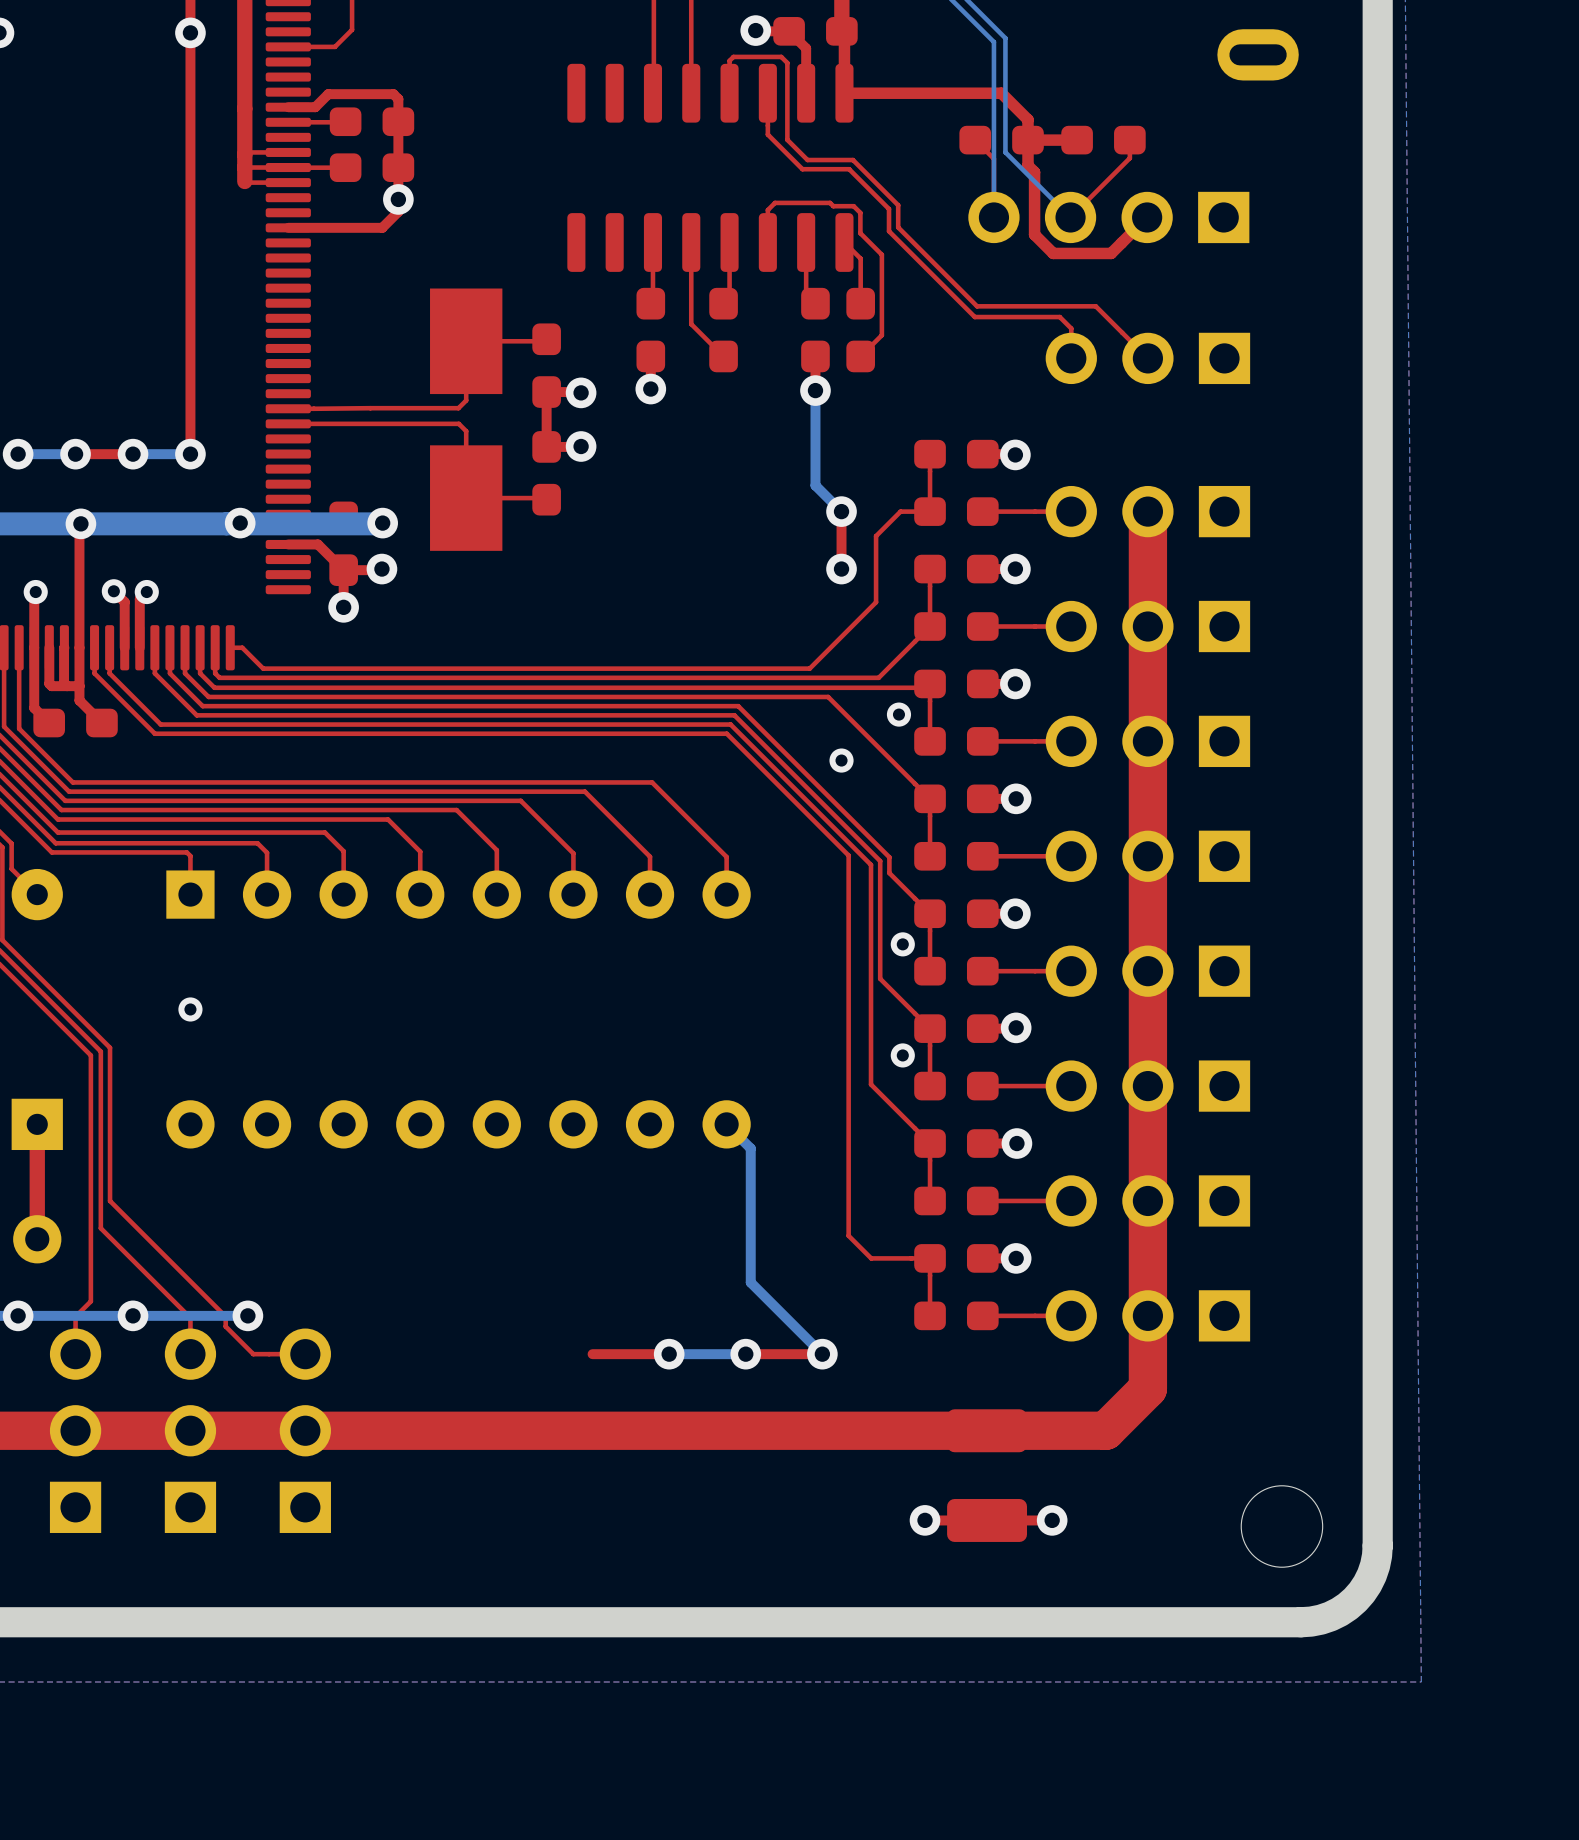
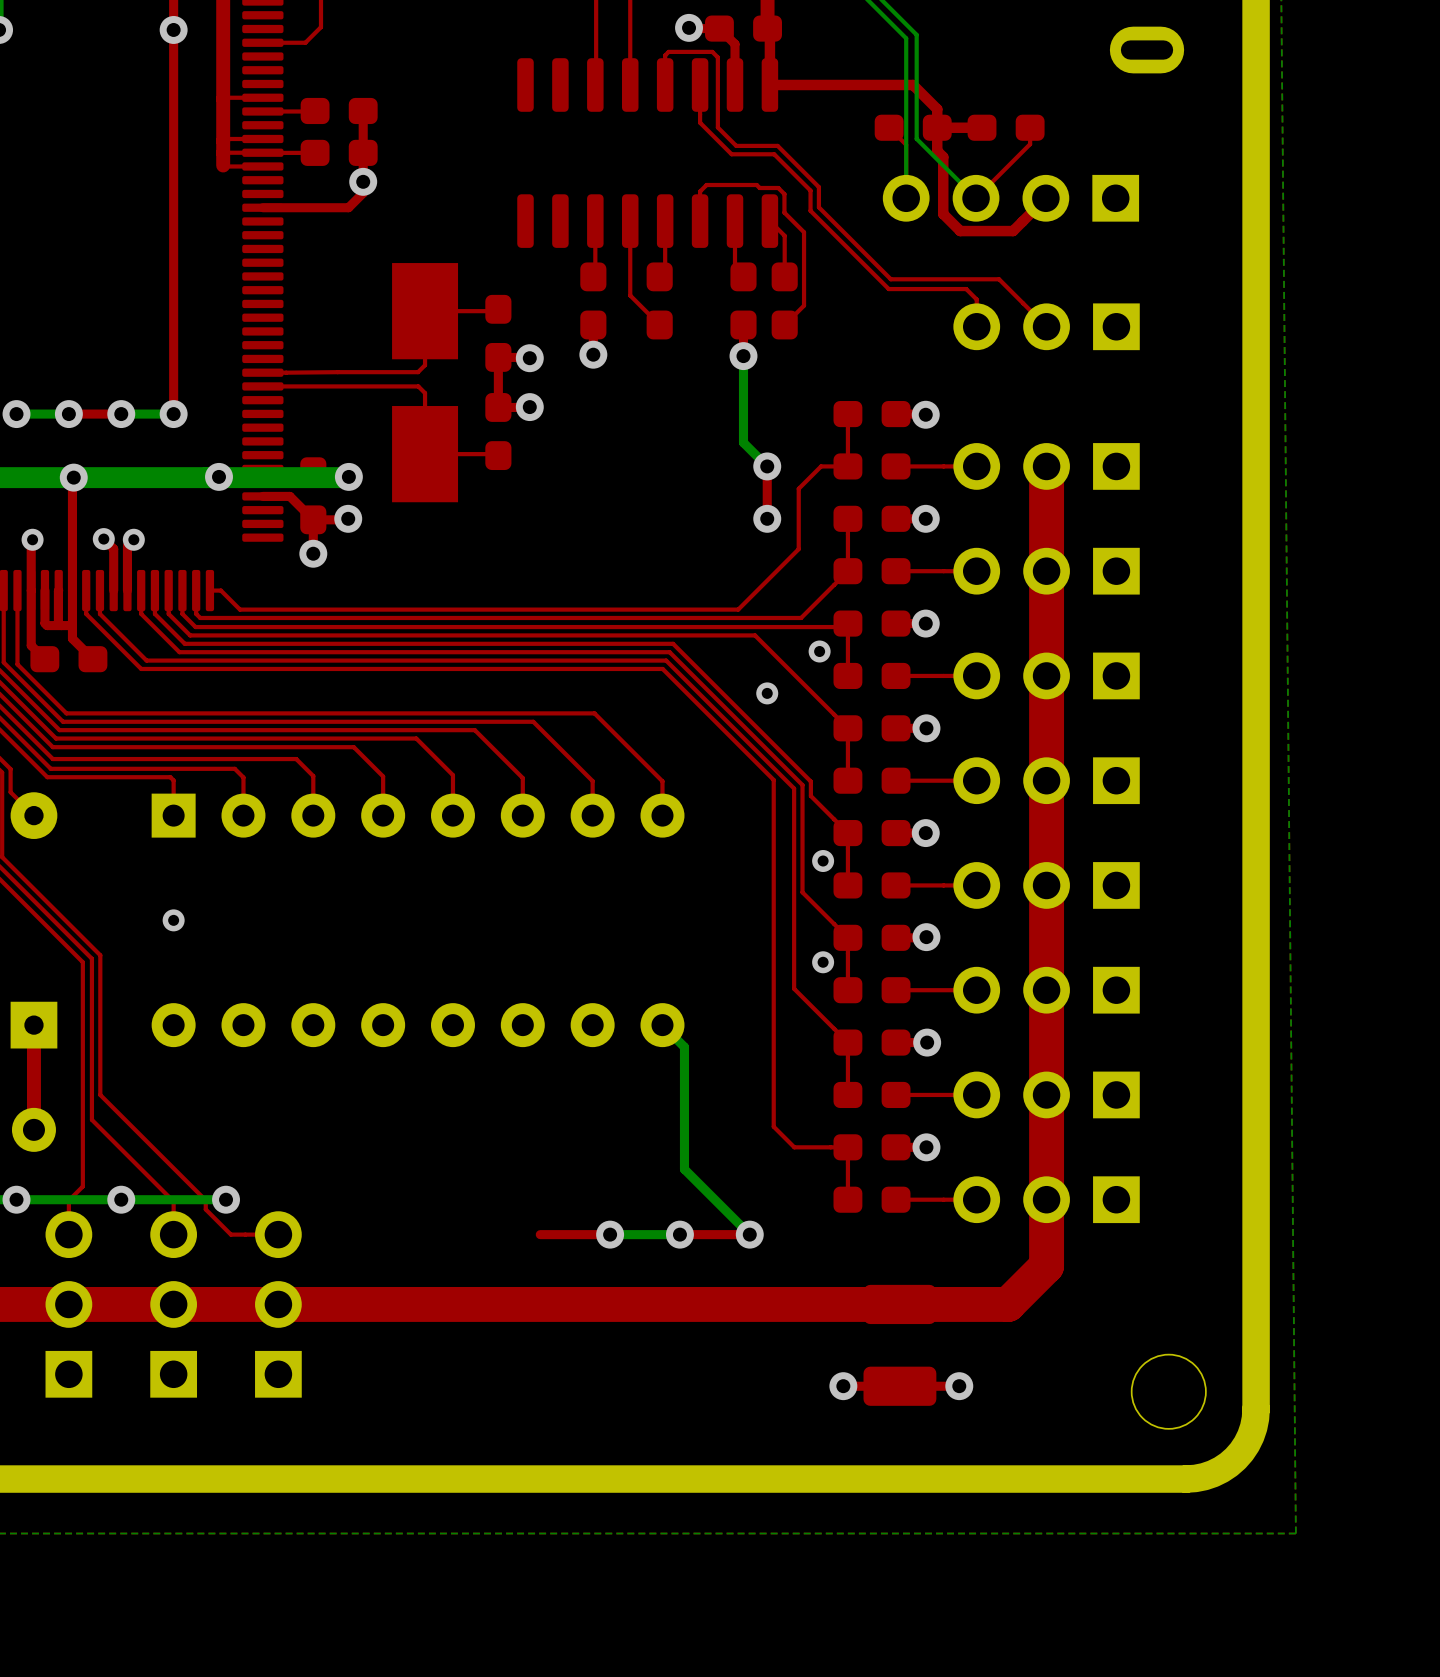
top track: none -> (248, 97) (224, 97)
top track: (288, 107) (315, 107) (328, 94) (393, 94) (398, 99) (398, 121) -> none

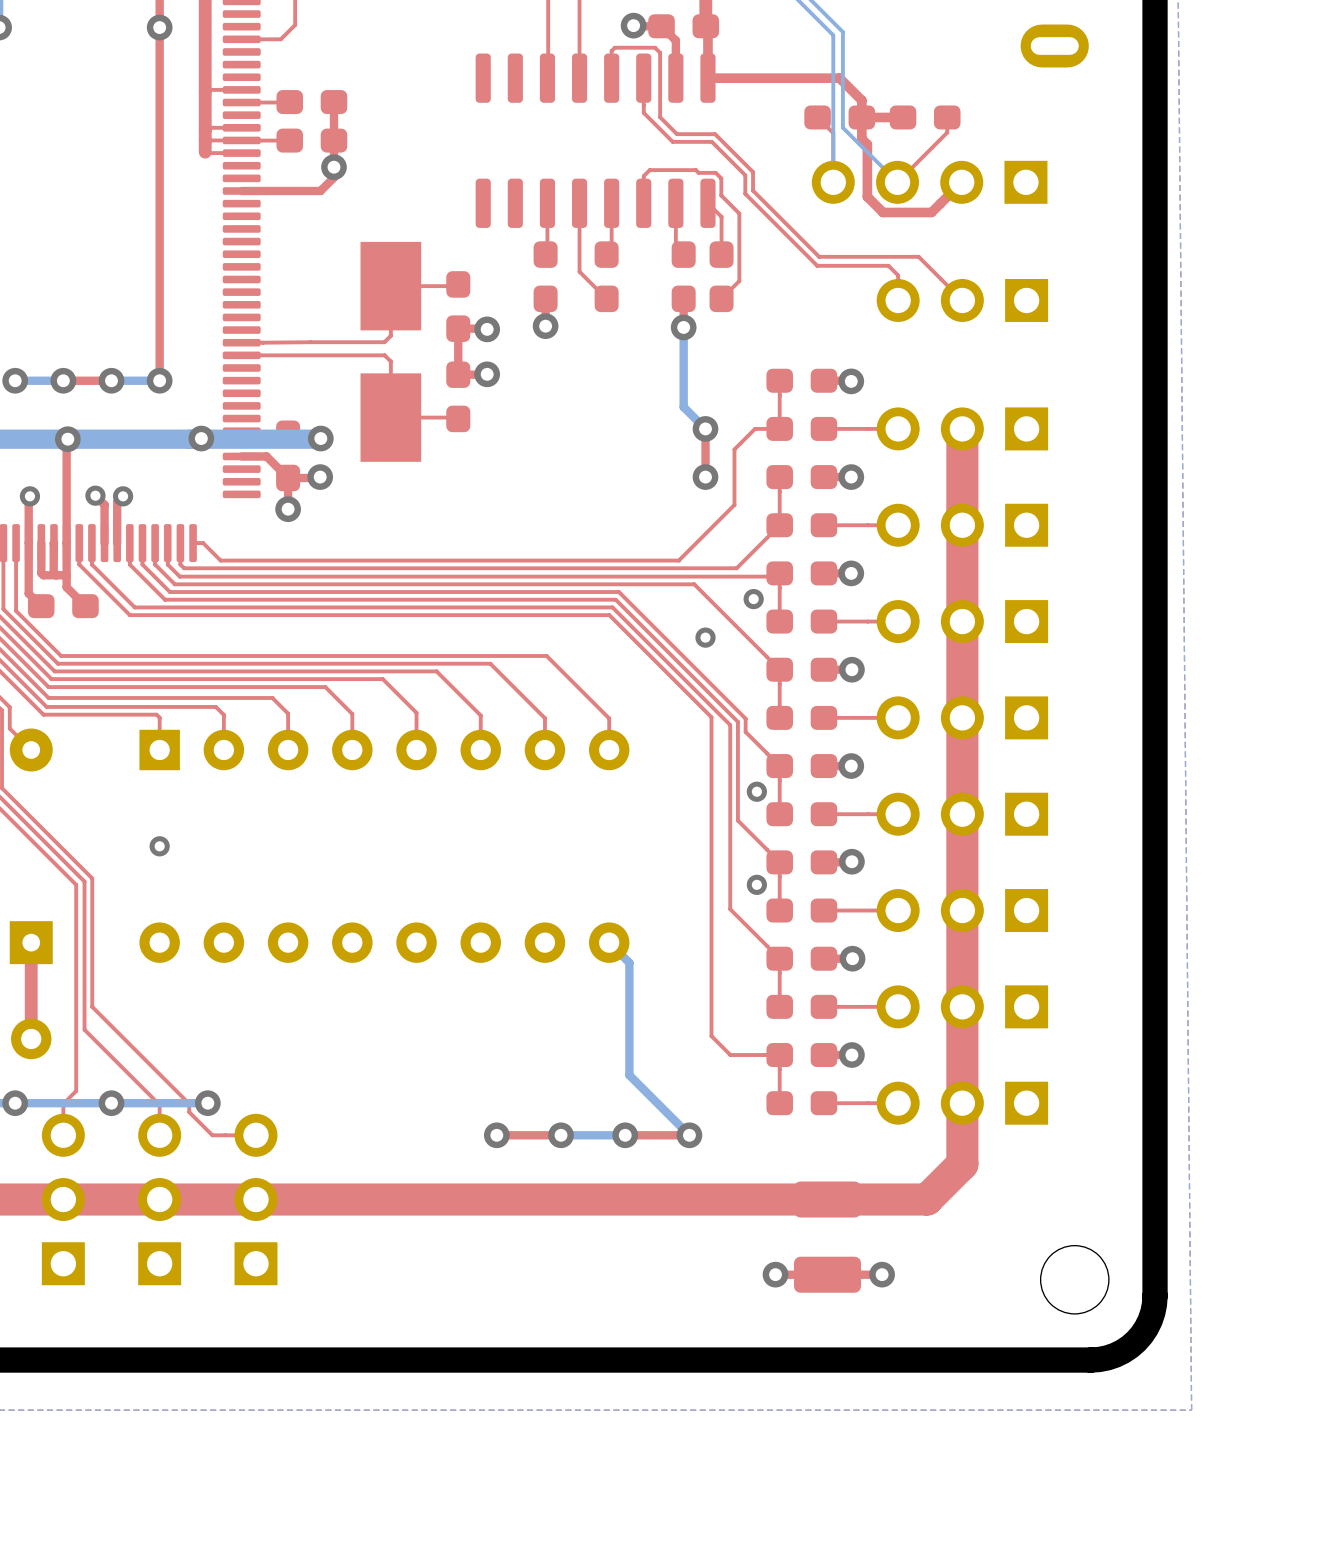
via: none -> (496, 1135)

